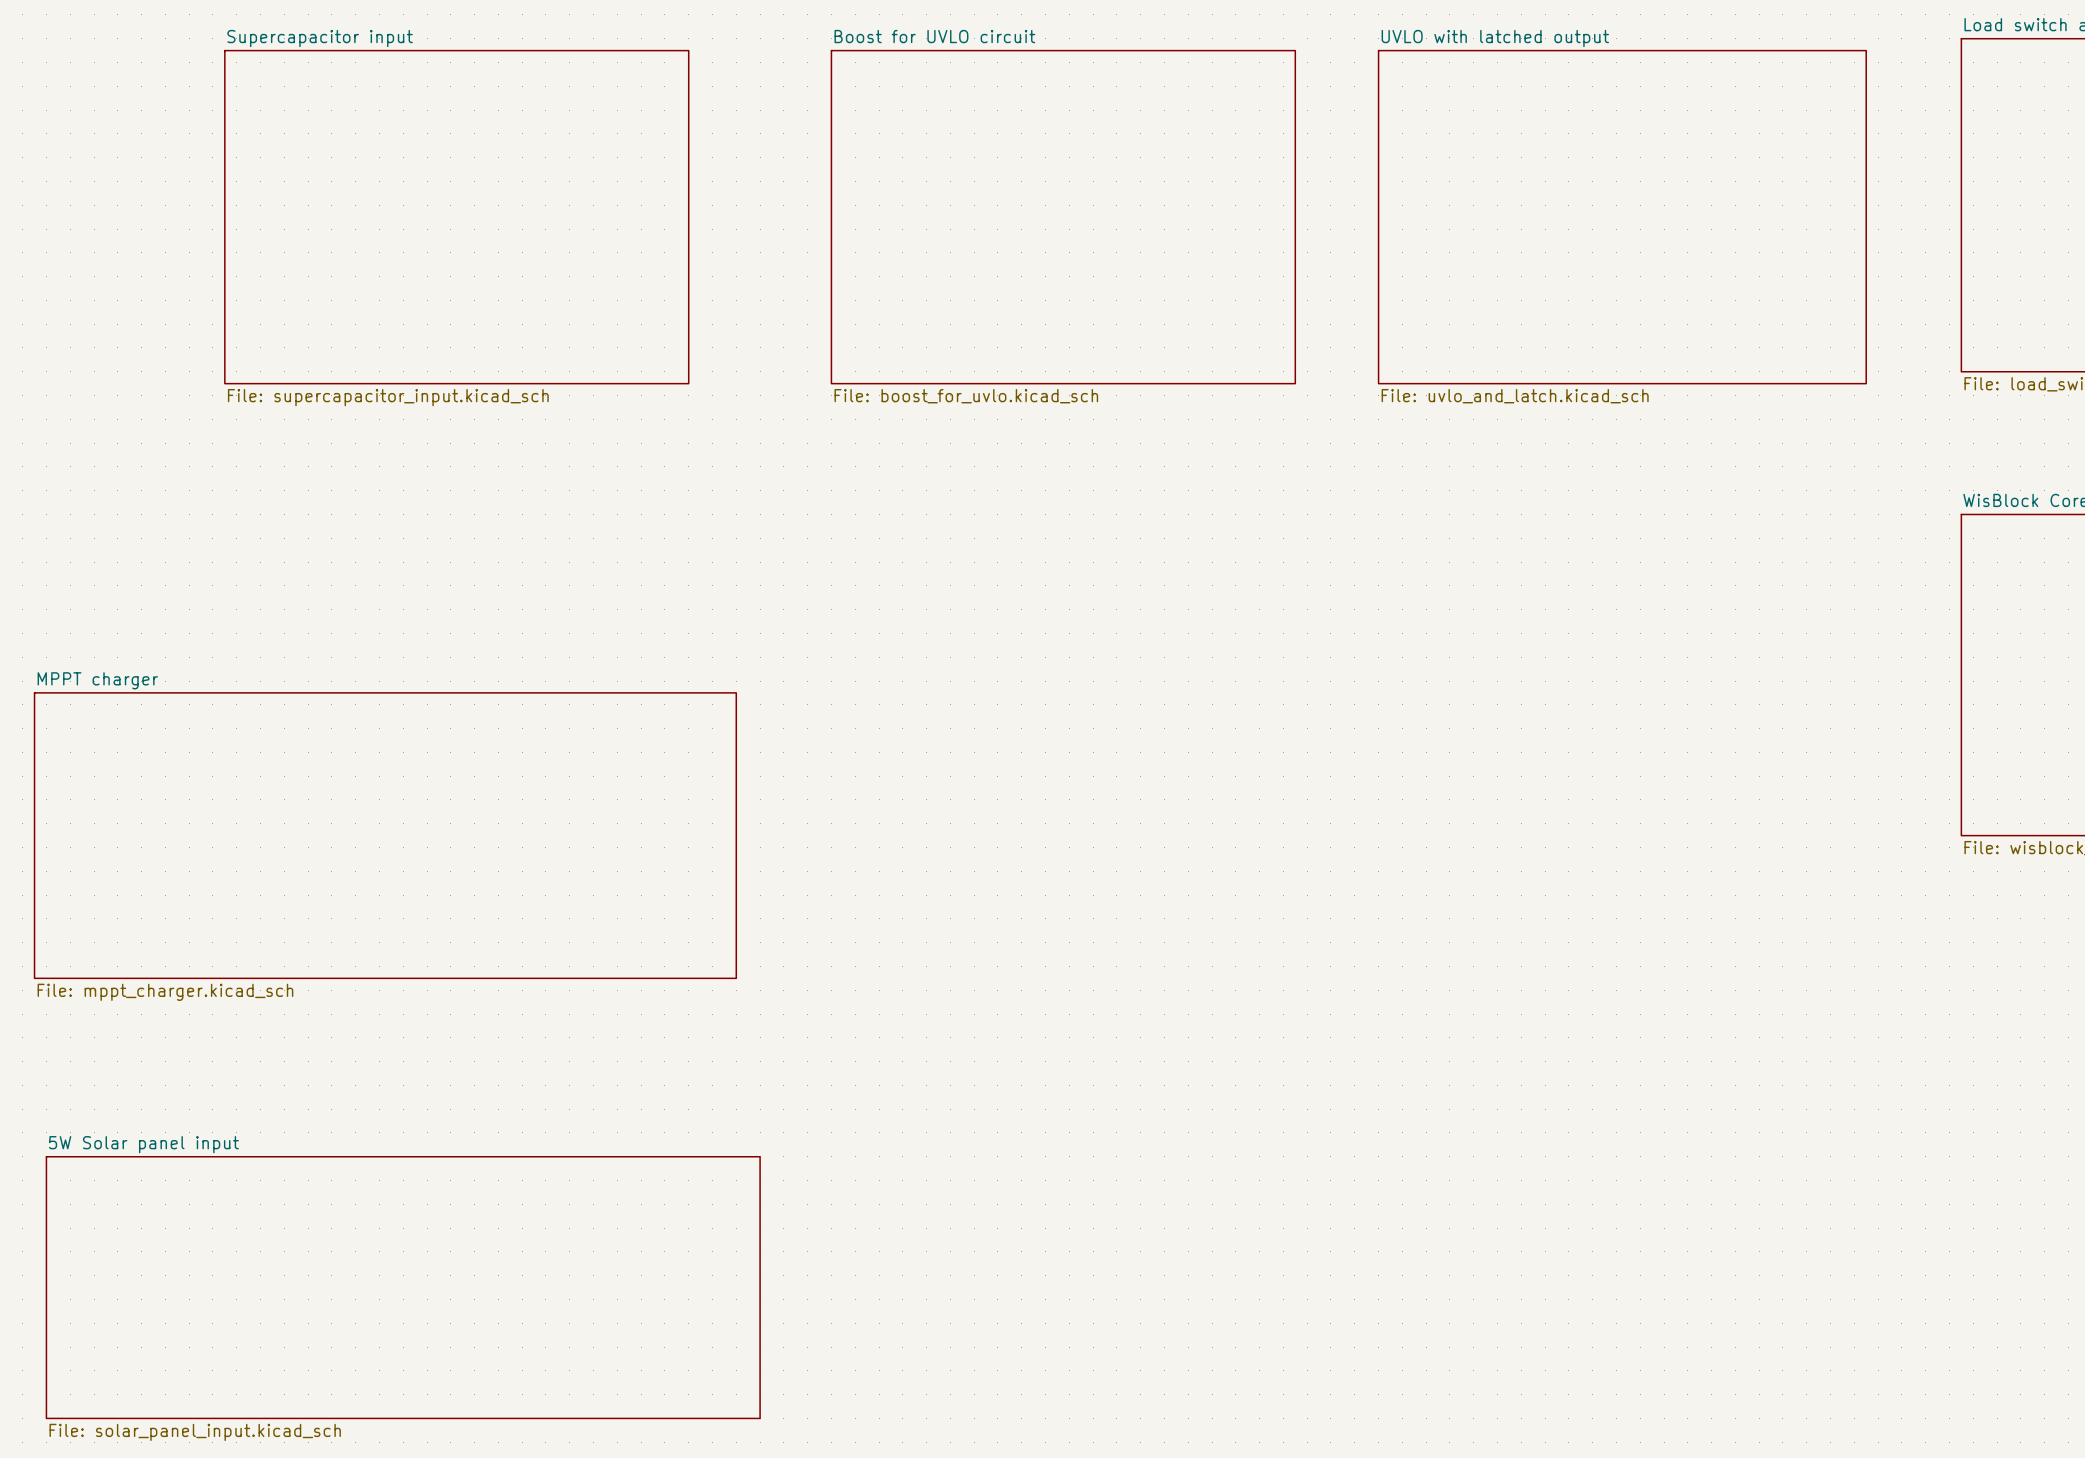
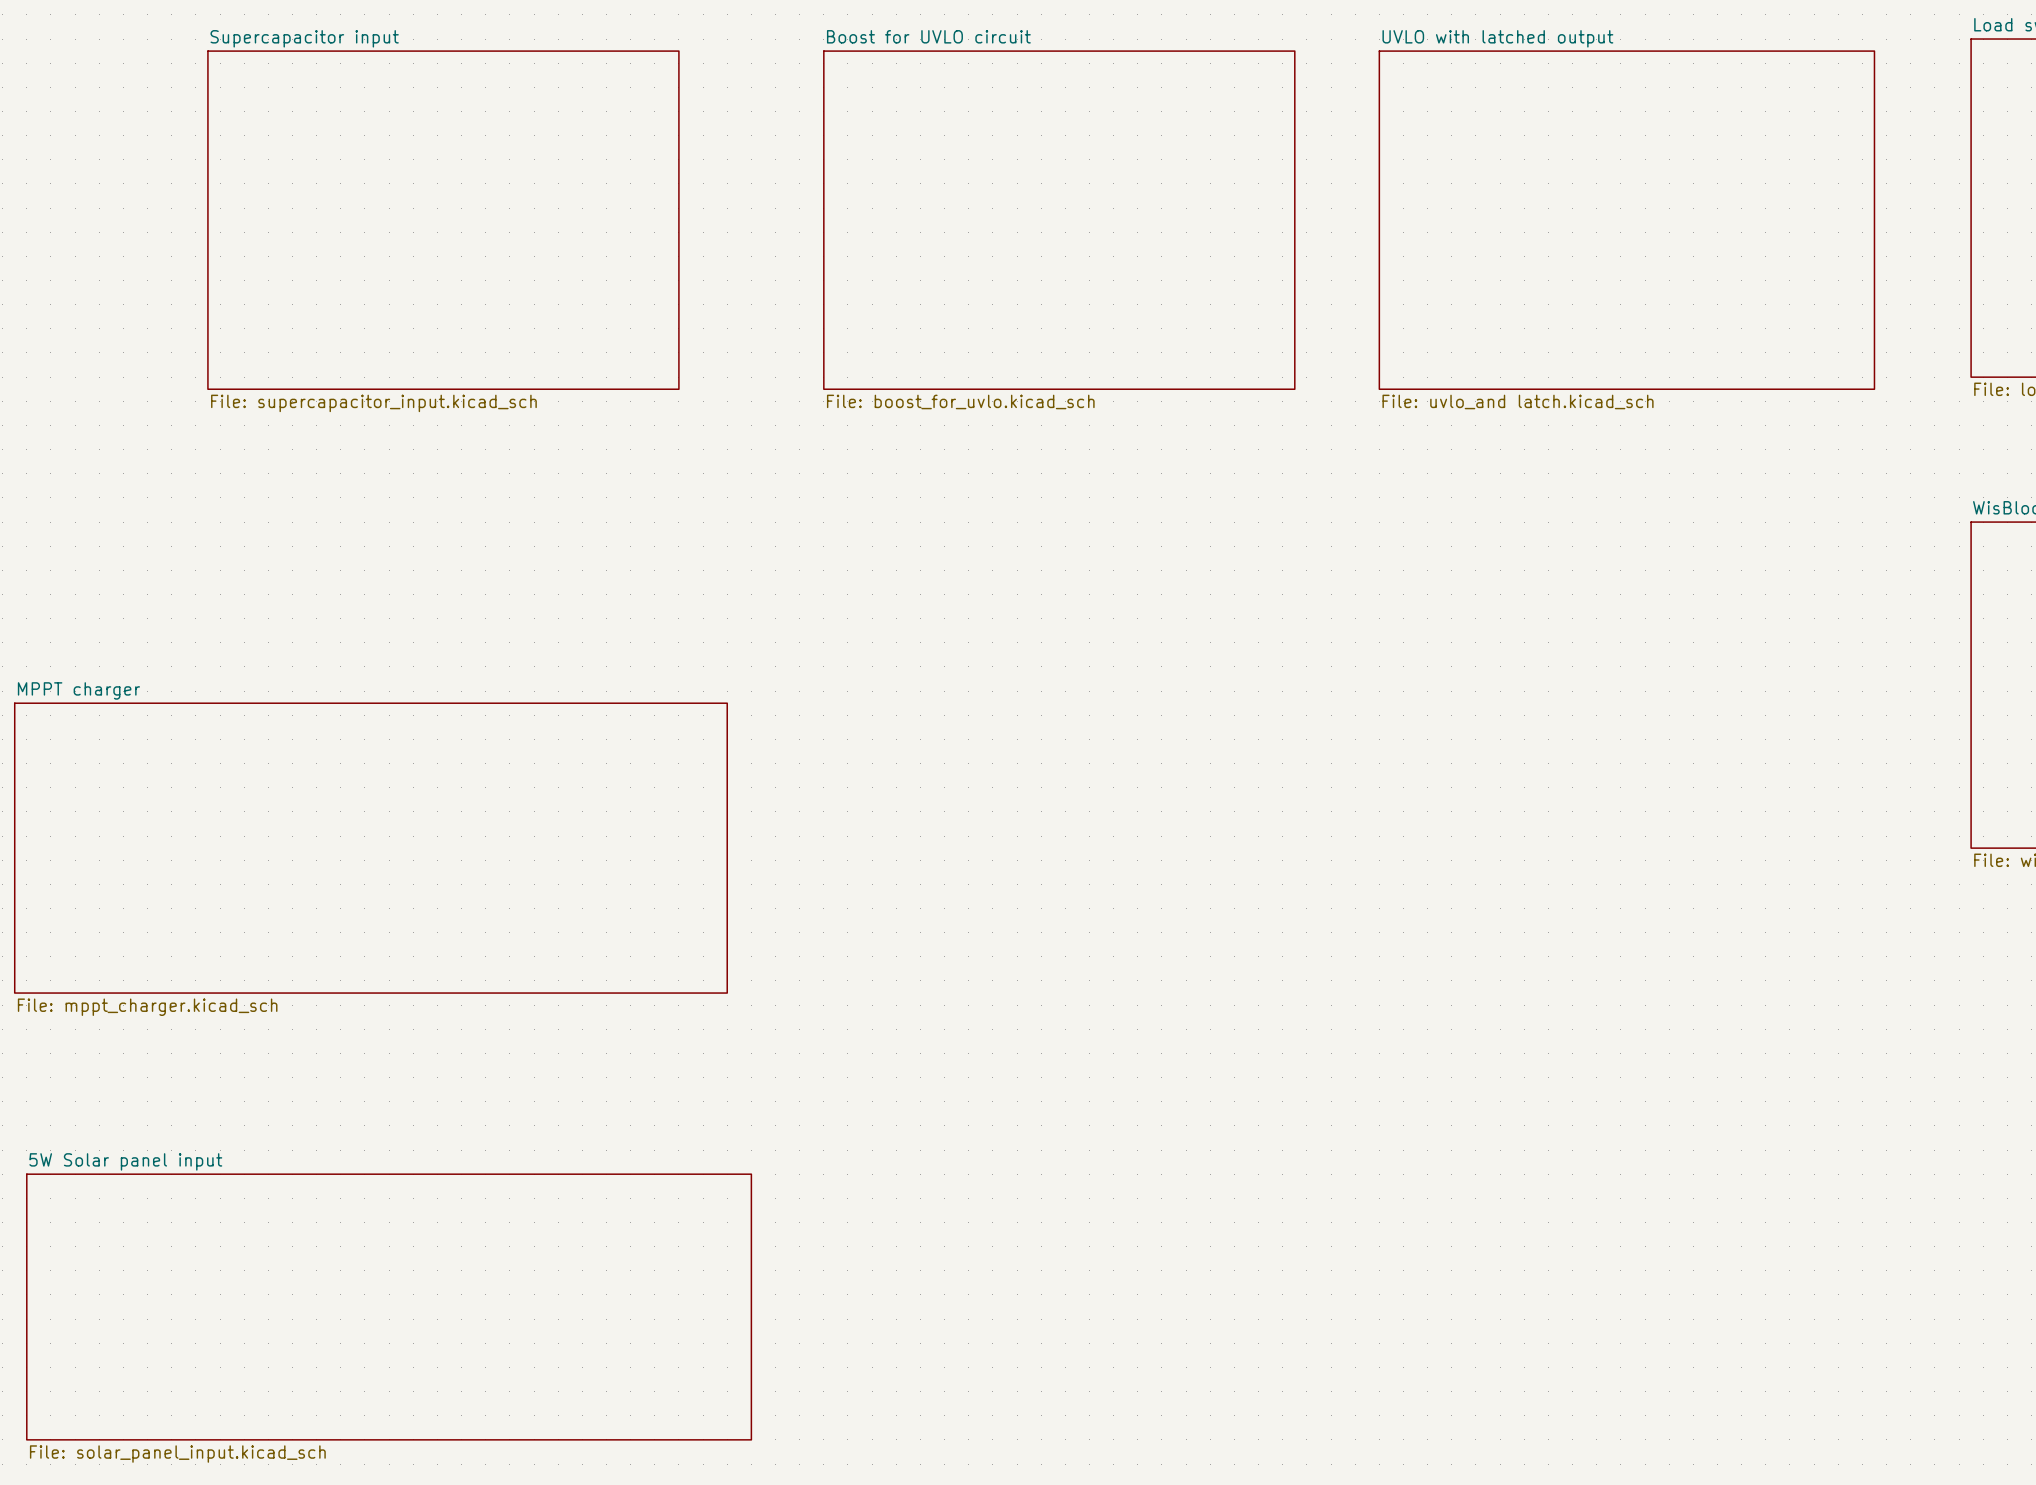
sheet UVLO with latched output value: File: uvlo_and_latch.kicad_sch (1515, 396) -> File: uvlo_and latch.kicad_sch (1518, 401)

